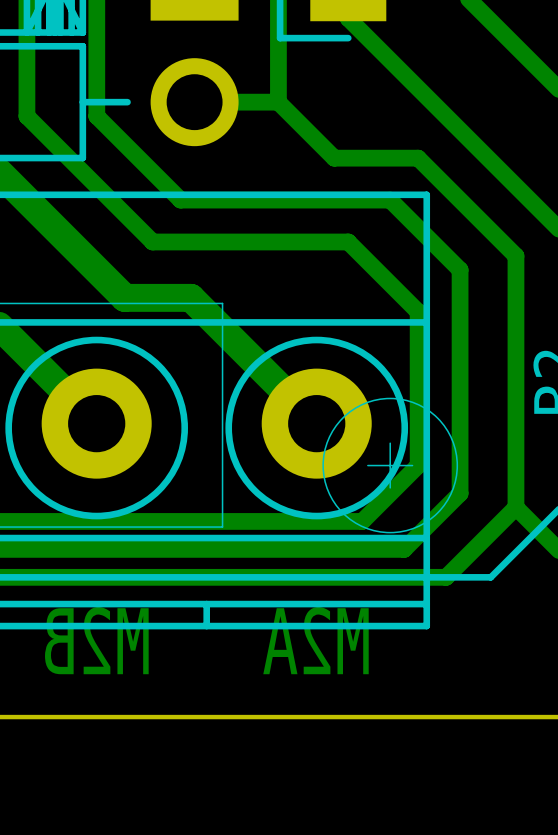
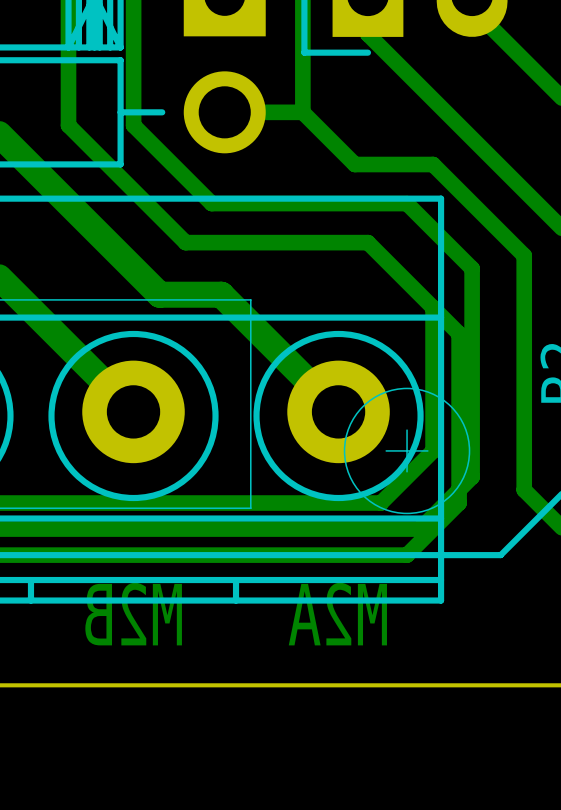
bottom track: (515, 507) (446, 577) (390, 577) -> (433, 307) (459, 333) (459, 503) (407, 555)

